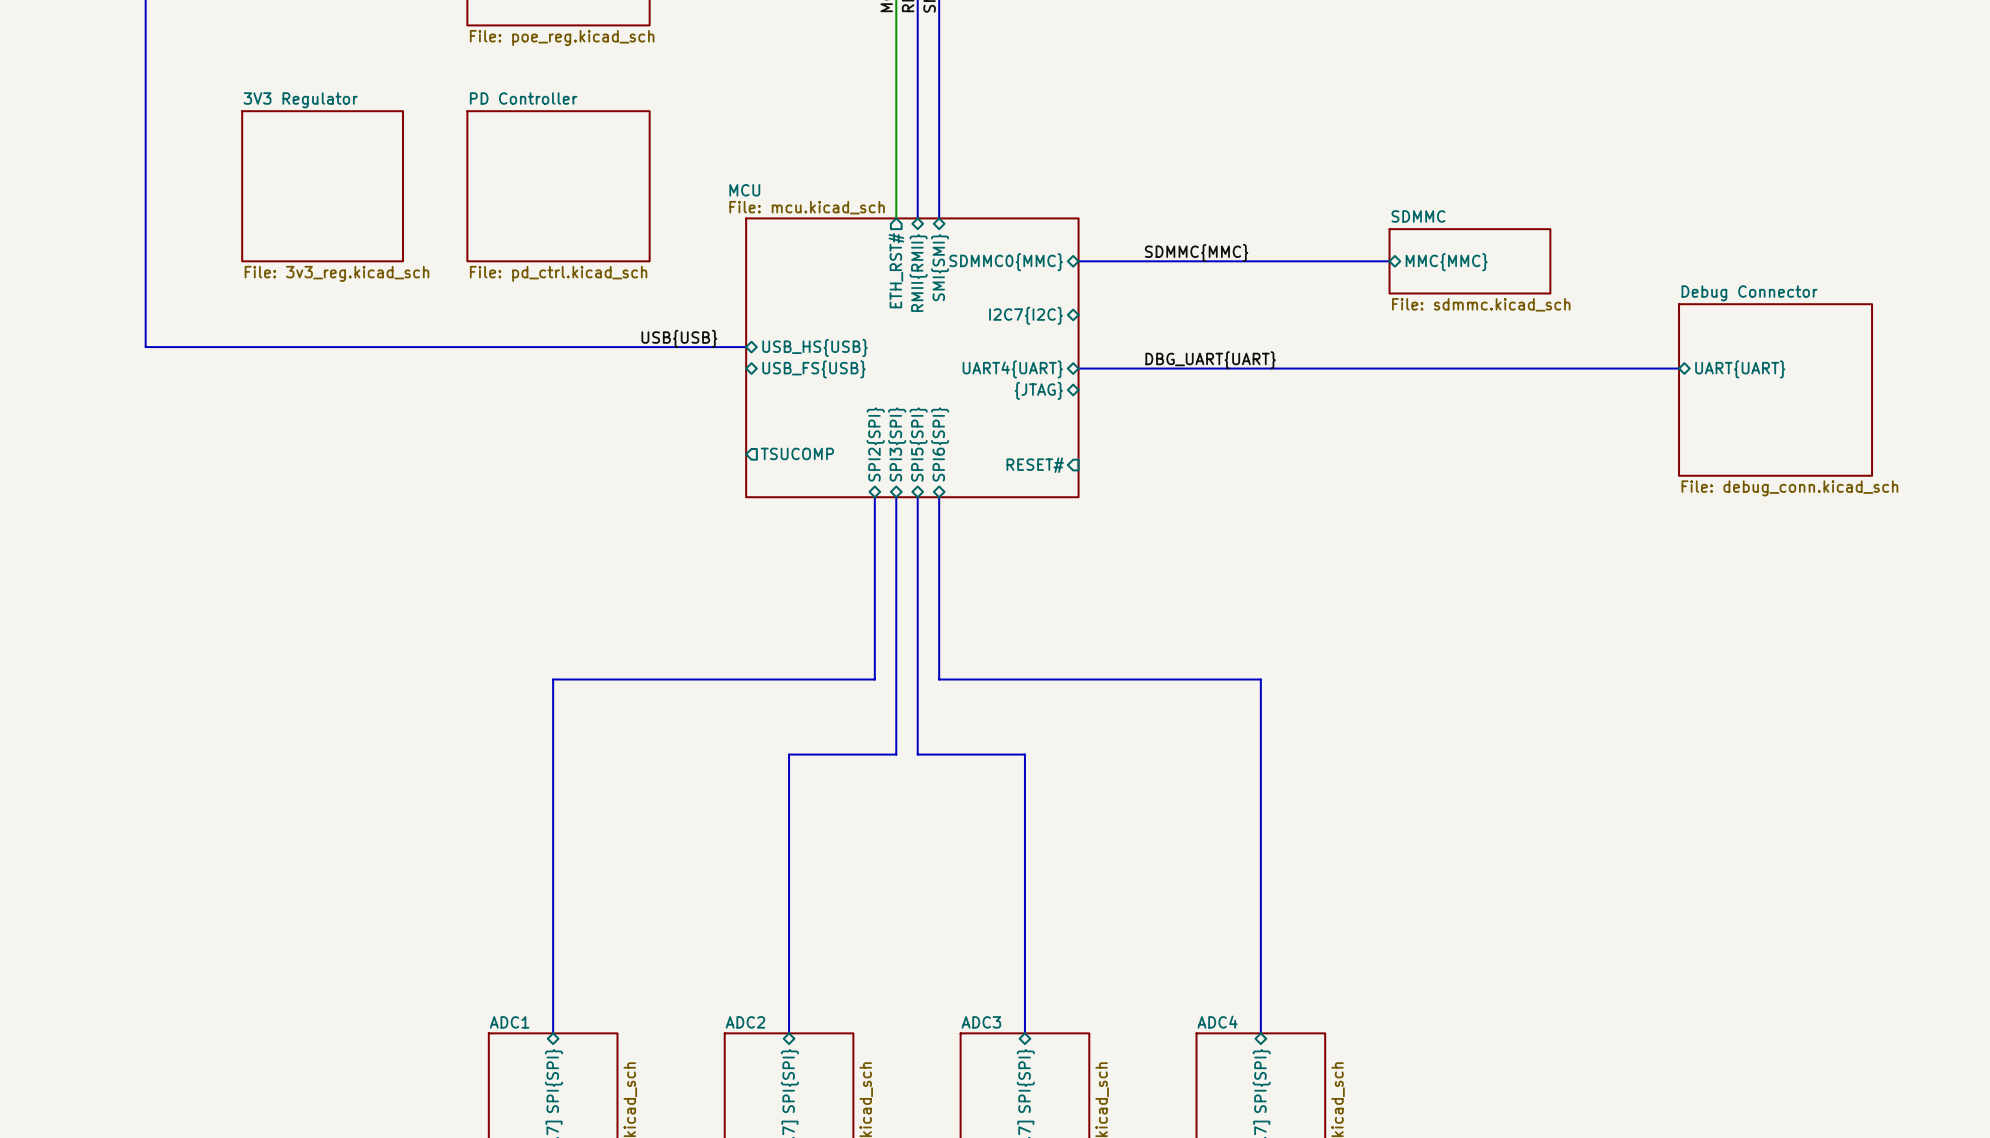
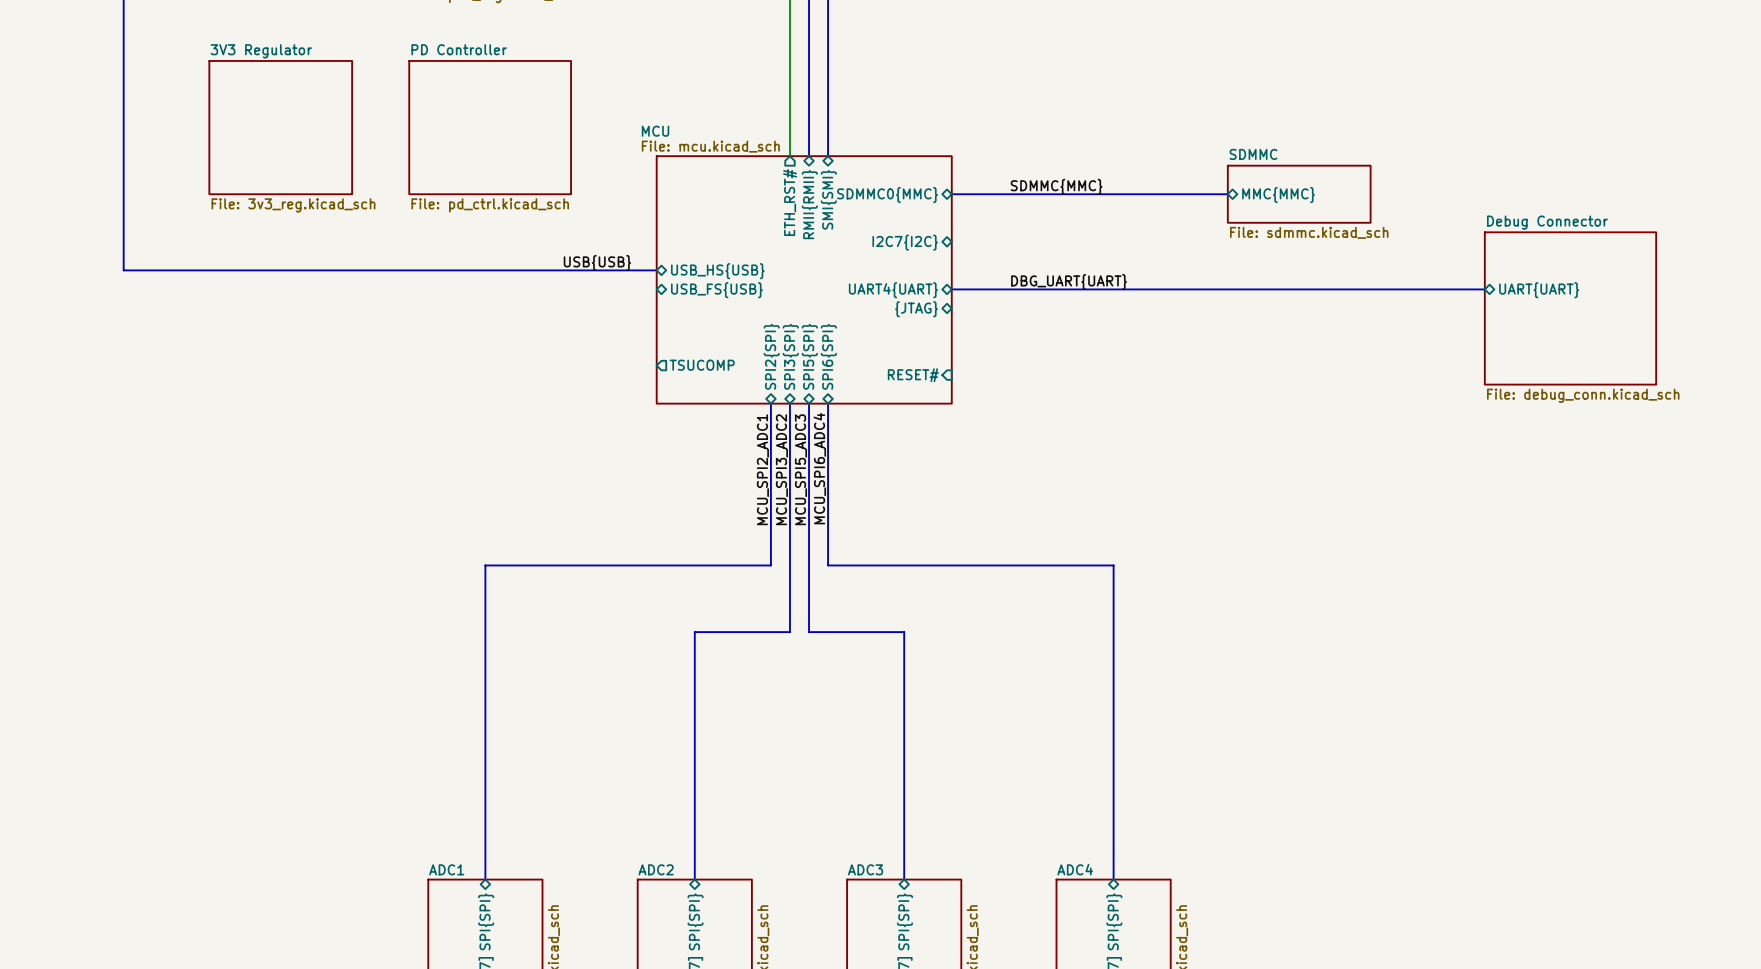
label: none -> MCU_SPI6_ADC4 (819, 468)
label: none -> MCU_SPI2_ADC1 (762, 469)
label: none -> MCU_SPI3_ADC2 (781, 469)
label: none -> MCU_SPI5_ADC3 (800, 469)

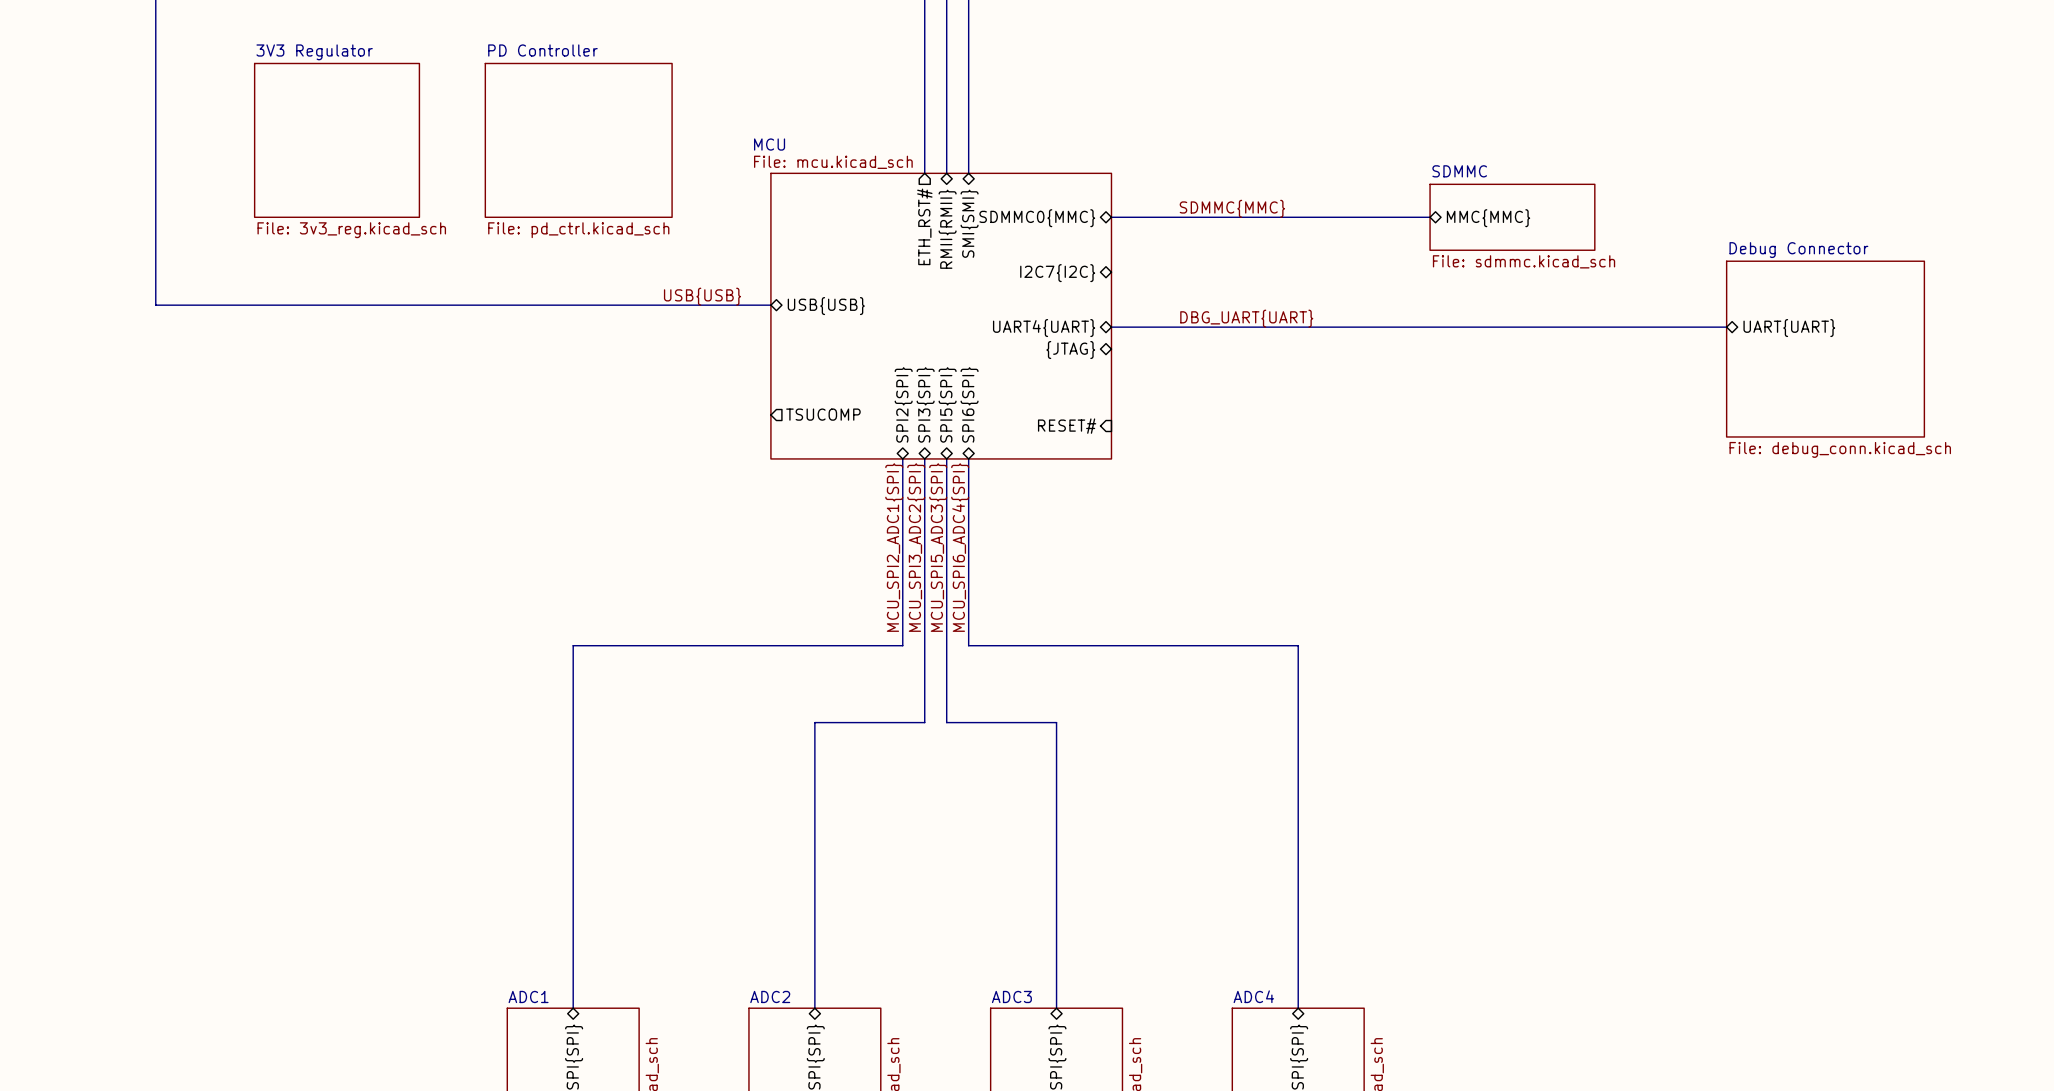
sheet pin: USB_HS{USB} (717, 271) -> USB{USB} (826, 306)
sheet pin: USB_FS{USB} (716, 290) -> none
label: MCU_SPI6_ADC4 (819, 468) -> none
label: MCU_SPI2_ADC1 (762, 469) -> none
label: MCU_SPI3_ADC2 (781, 469) -> none
label: MCU_SPI5_ADC3 (800, 469) -> none
label: none -> MCU_SPI2_ADC1{SPI} (894, 547)
label: none -> MCU_SPI3_ADC2{SPI} (916, 547)
label: none -> MCU_SPI5_ADC3{SPI} (938, 547)
label: none -> MCU_SPI6_ADC4{SPI} (960, 547)

